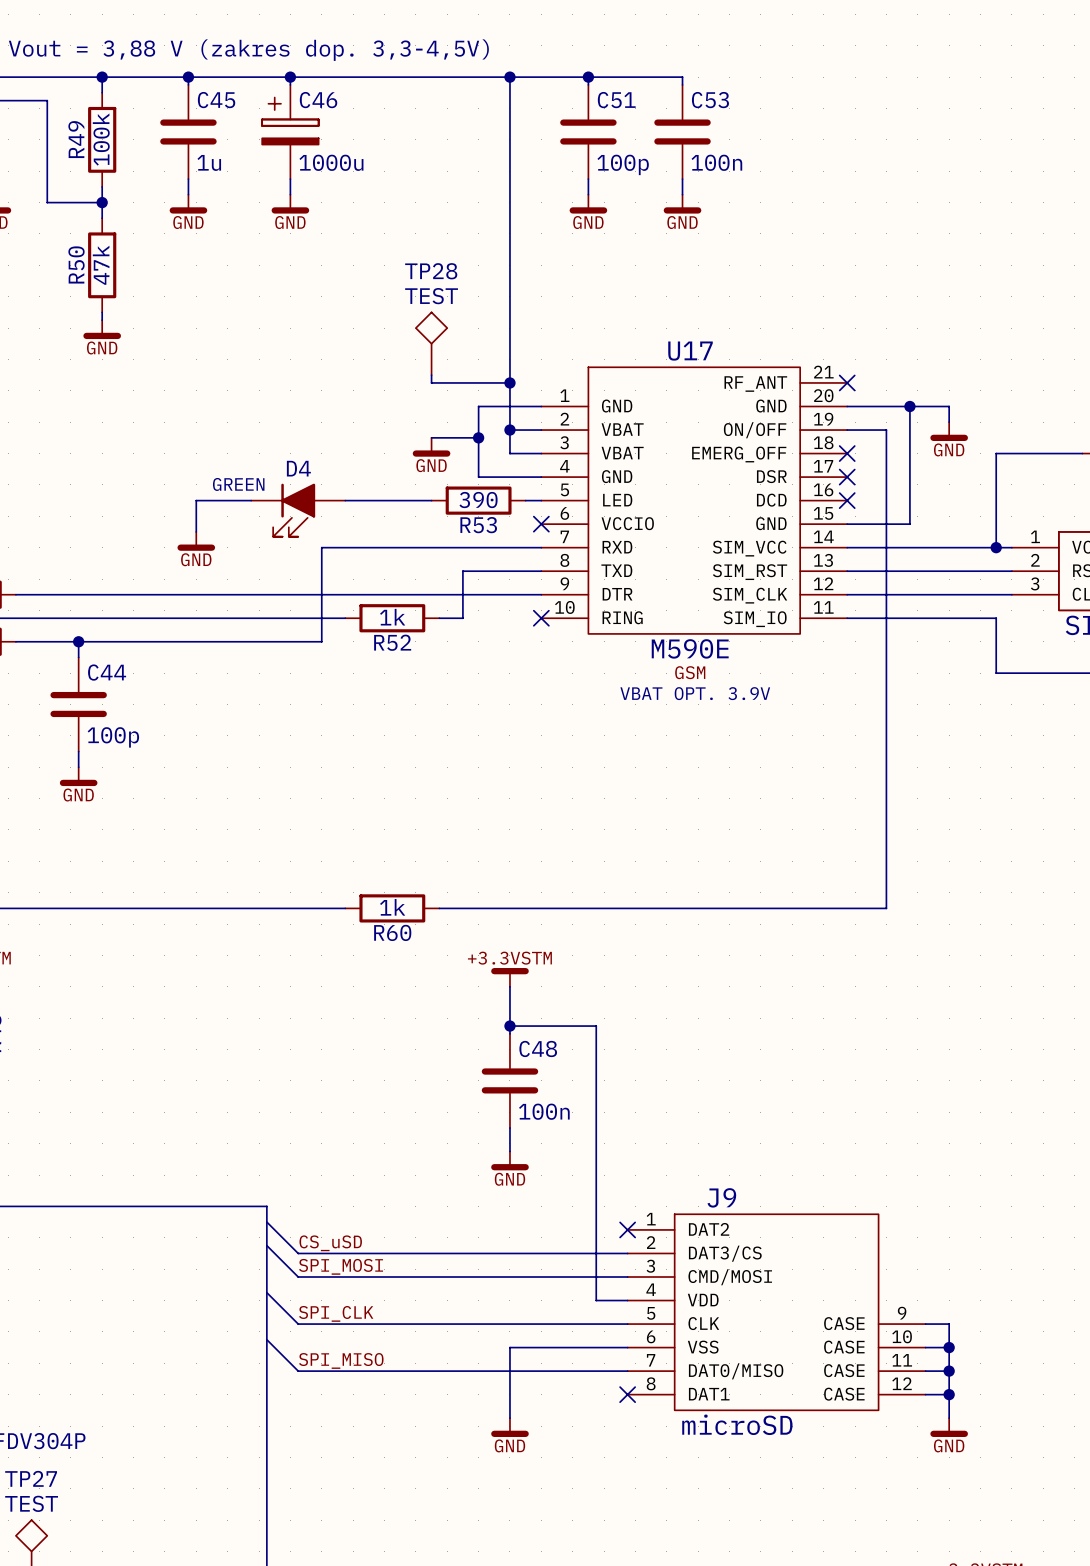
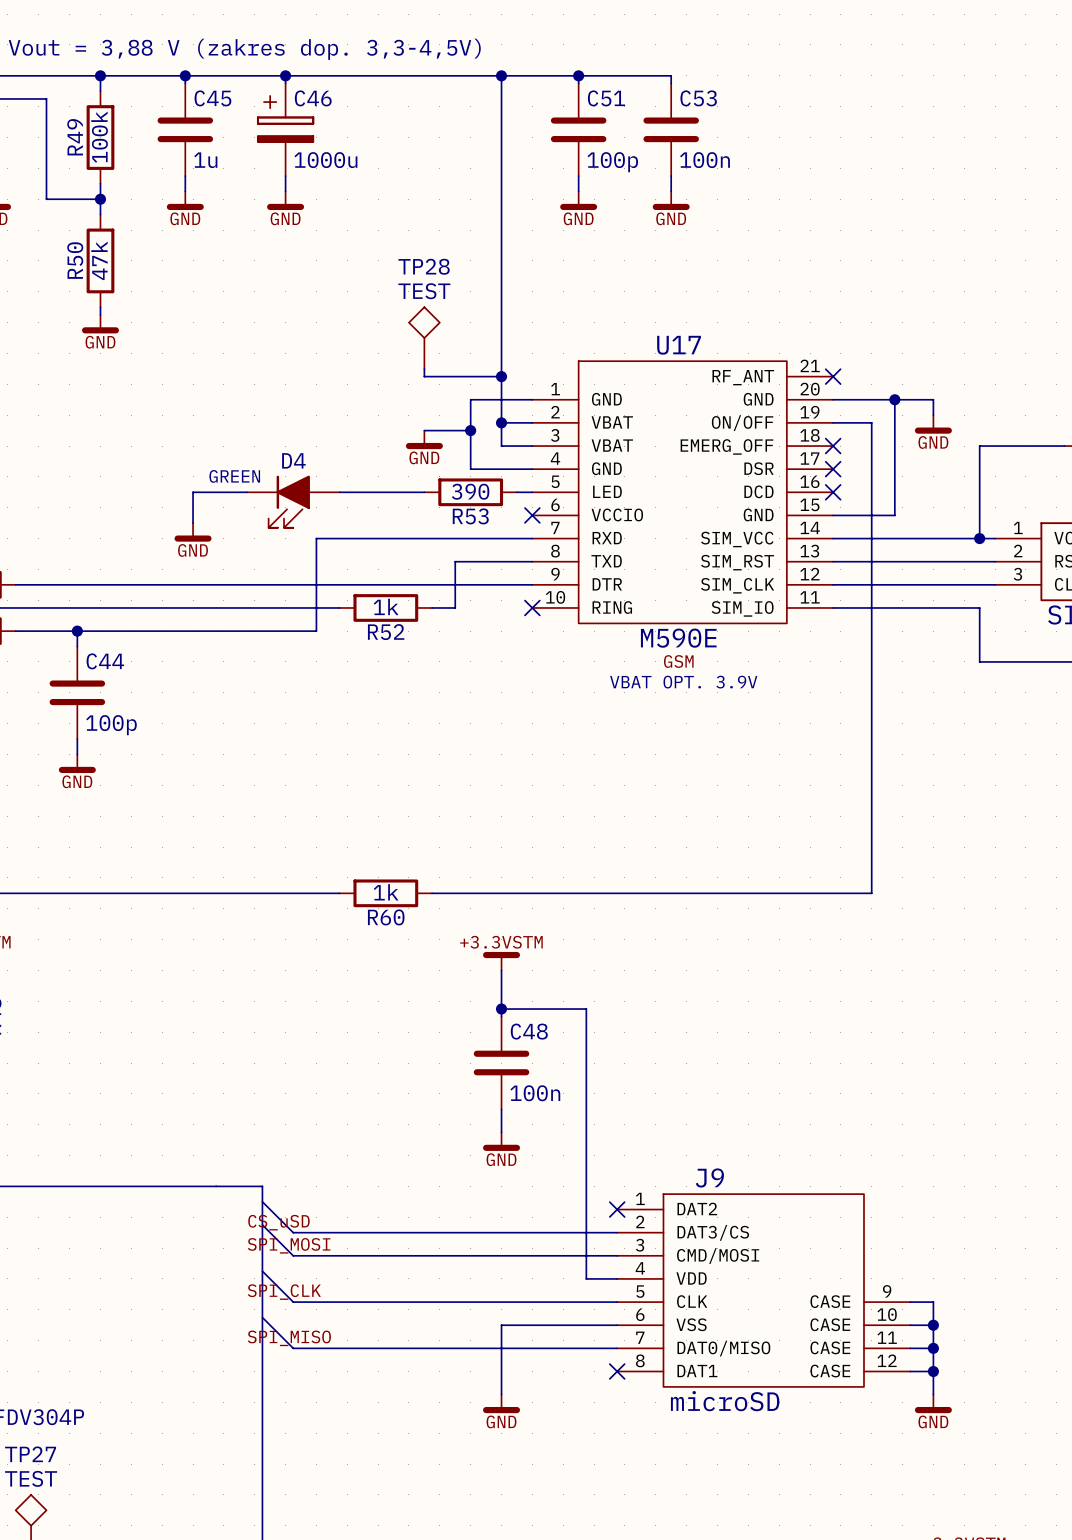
label position: CS_uSD (330, 1243) -> CS_uSD (278, 1222)
label position: SPI_MOSI (341, 1266) -> SPI_MOSI (289, 1245)
label position: SPI_CLK (336, 1313) -> SPI_CLK (284, 1292)
label position: SPI_MISO (341, 1360) -> SPI_MISO (289, 1338)

